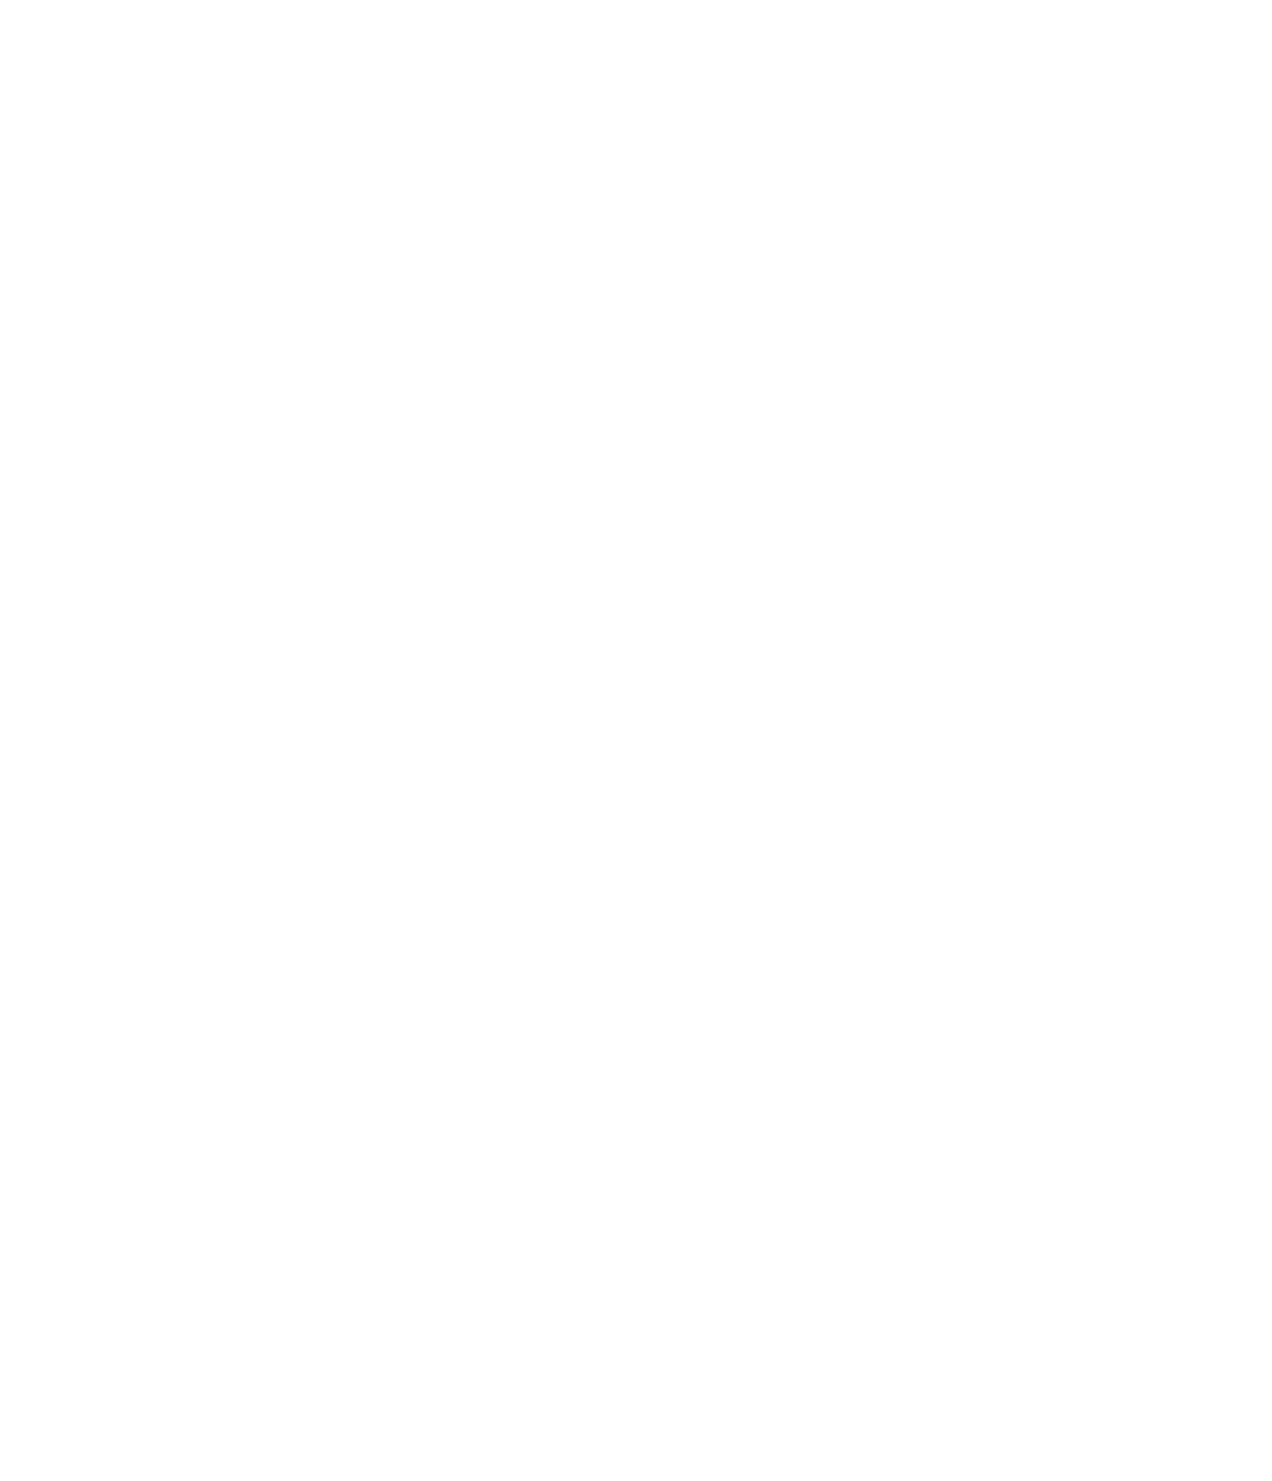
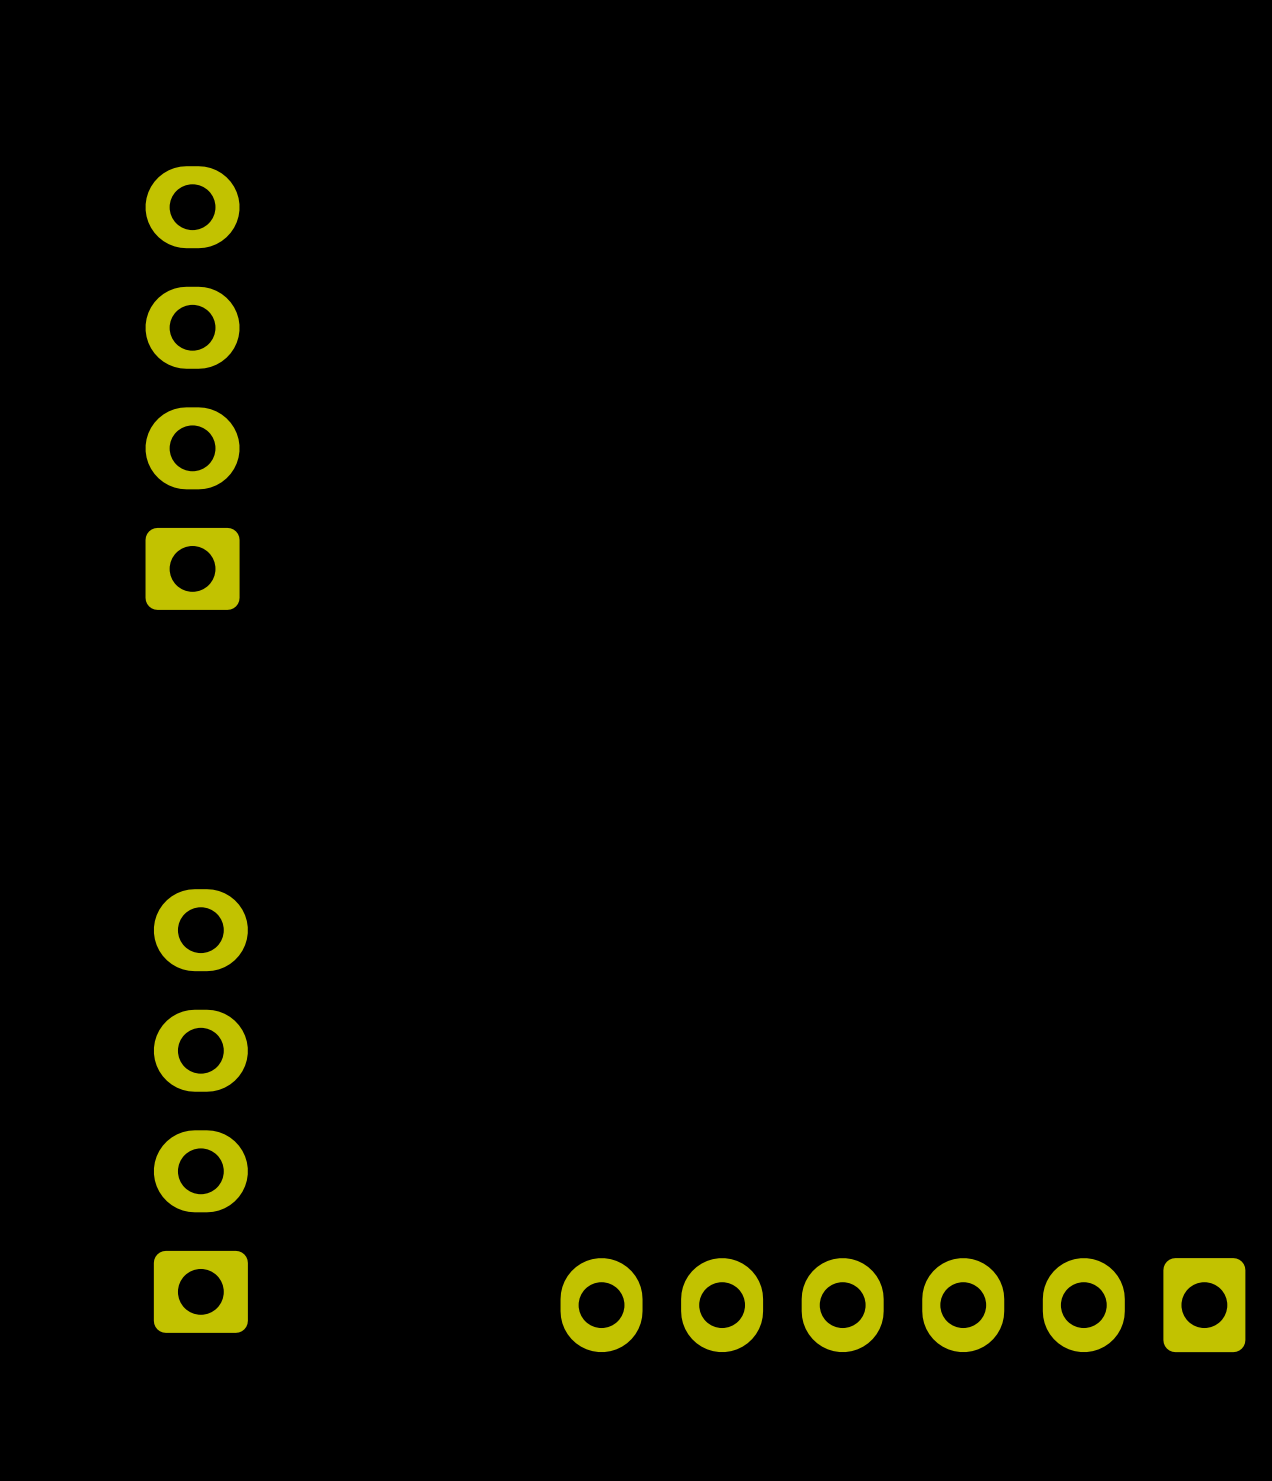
part: none -> (192, 388)
part: none -> (200, 1111)
part: none -> (902, 1305)

